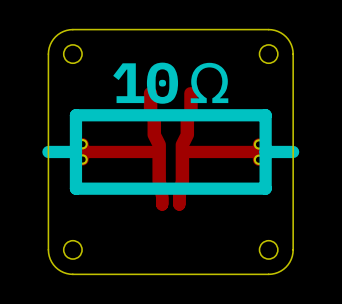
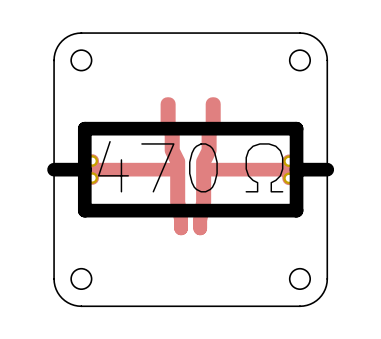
text: 10 Ω (170, 83) -> 470 Ω (190, 166)

